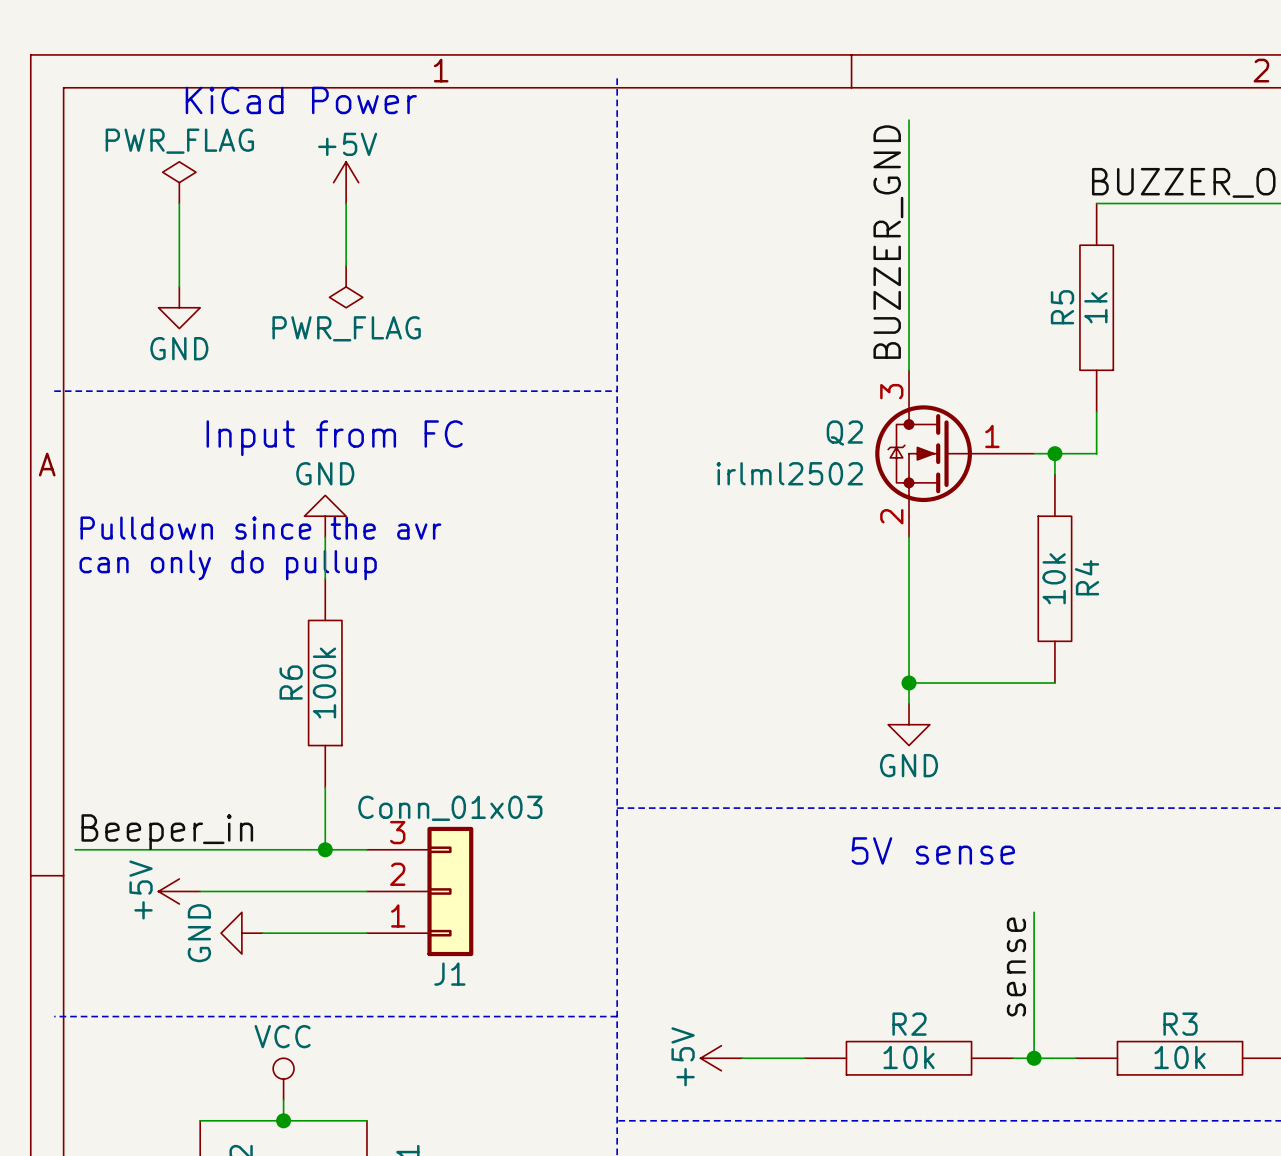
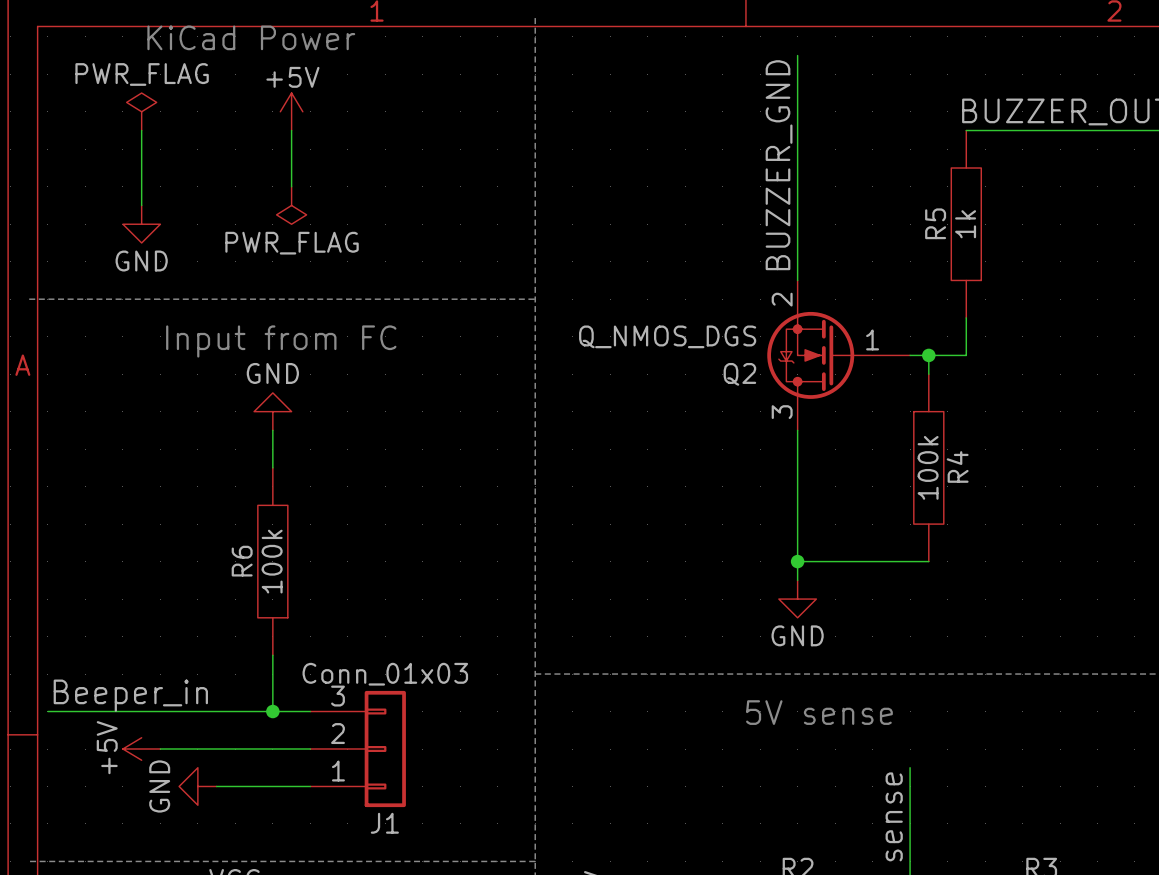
Q2 flip: as is (923, 453) -> up-down (810, 355)
Q2 value: irlml2502 (789, 473) -> Q_NMOS_DGS (667, 336)
text: Pulldown since the avr (260, 528) -> none
text: can only do pullup (228, 565) -> none
R4 value: 10k (1054, 578) -> 100k (928, 467)

